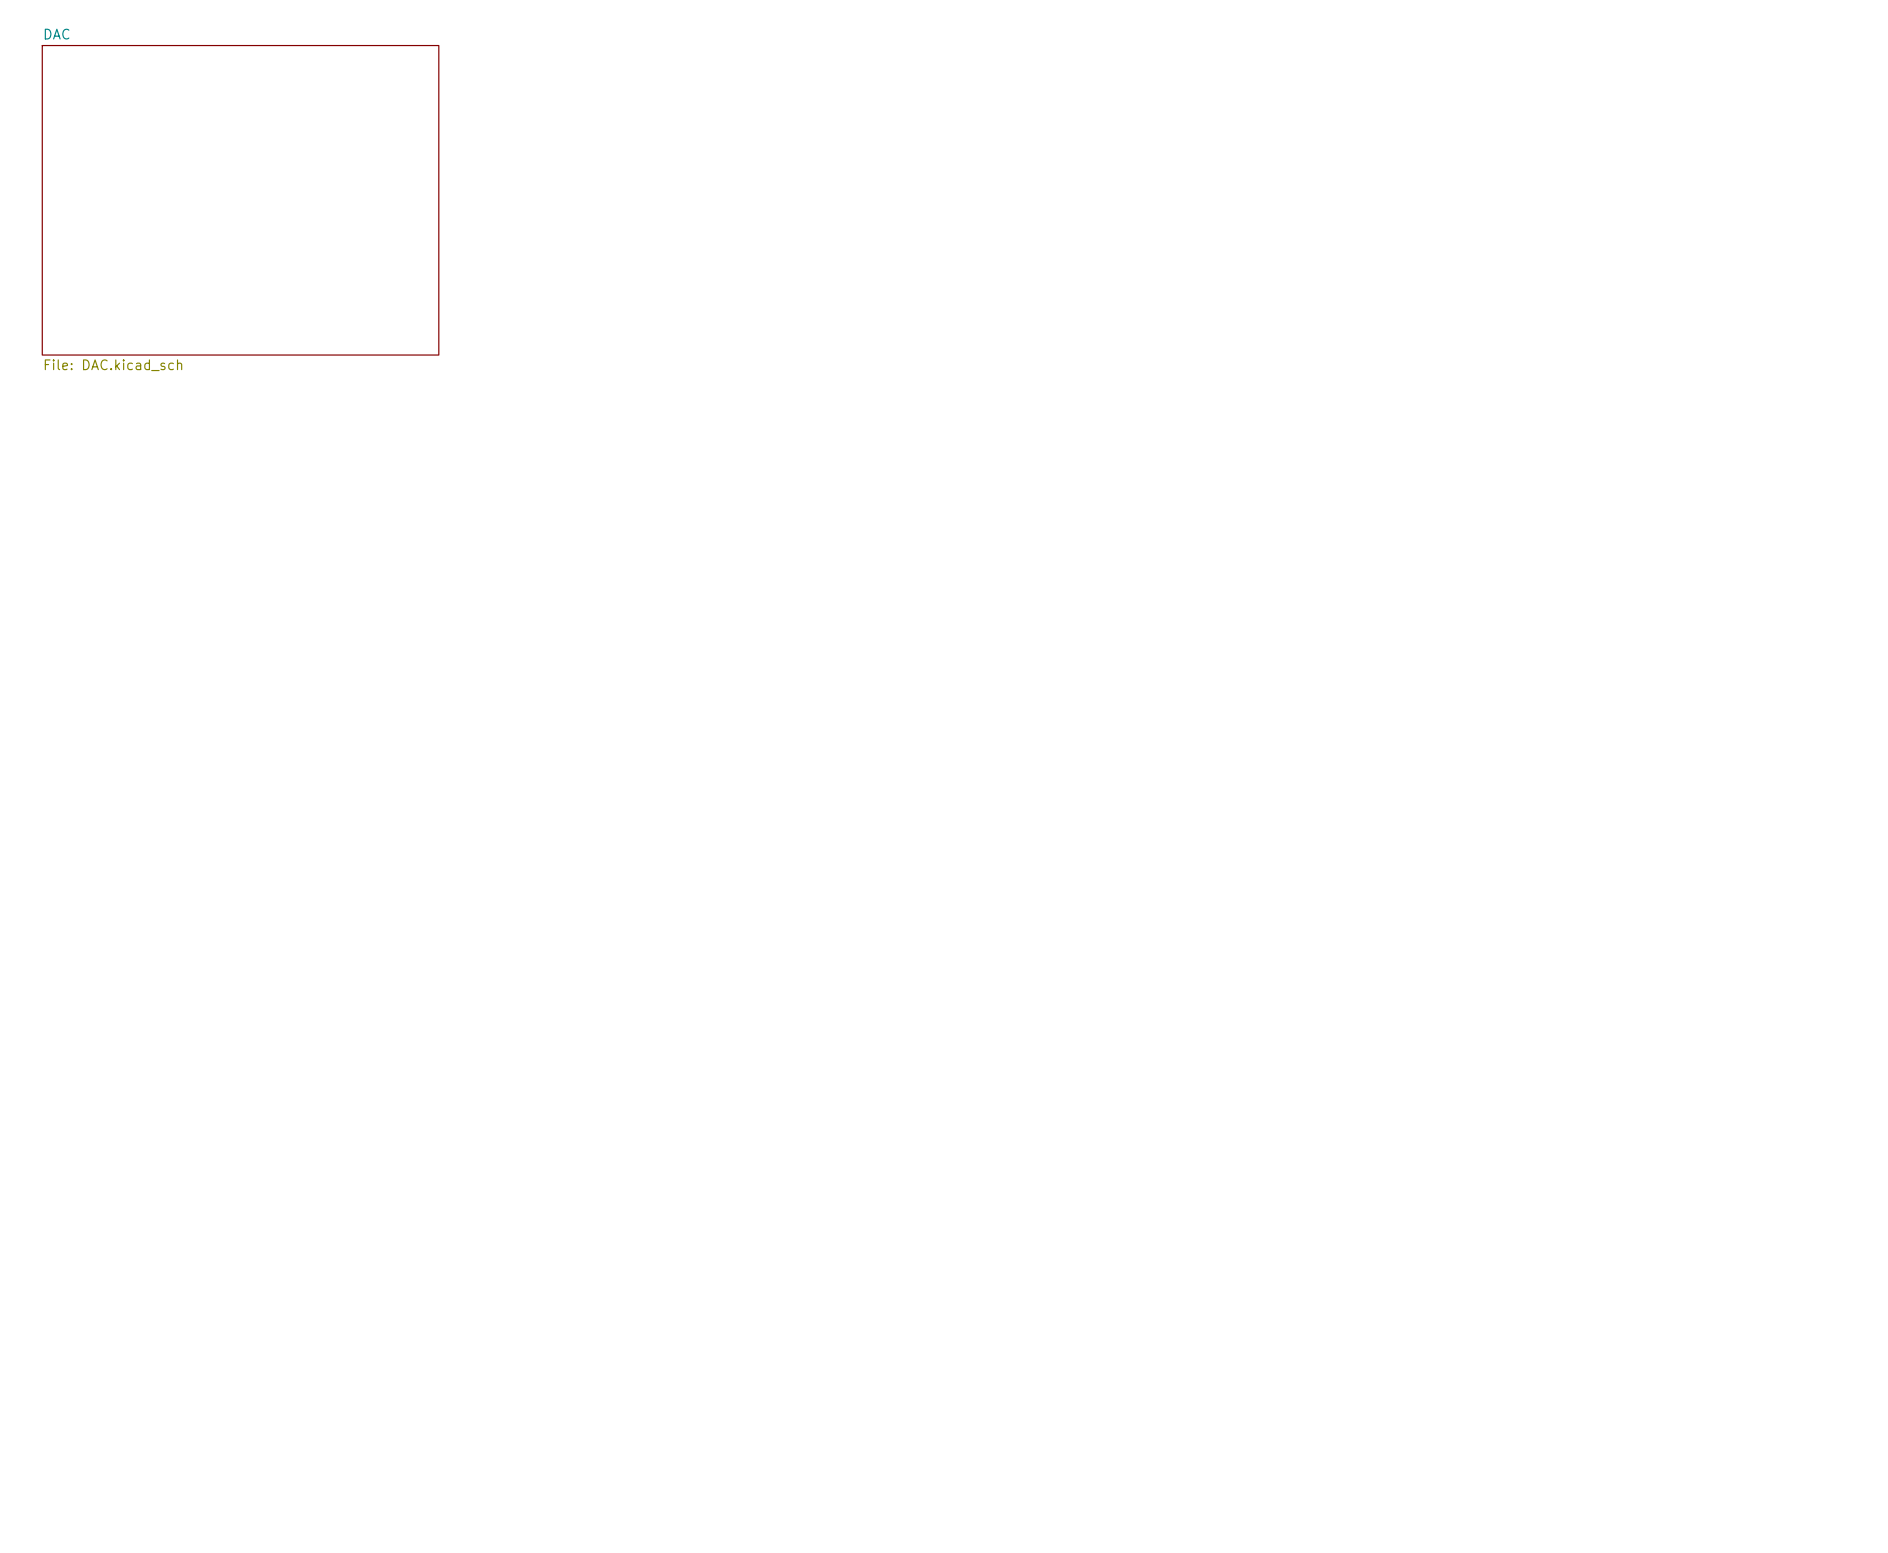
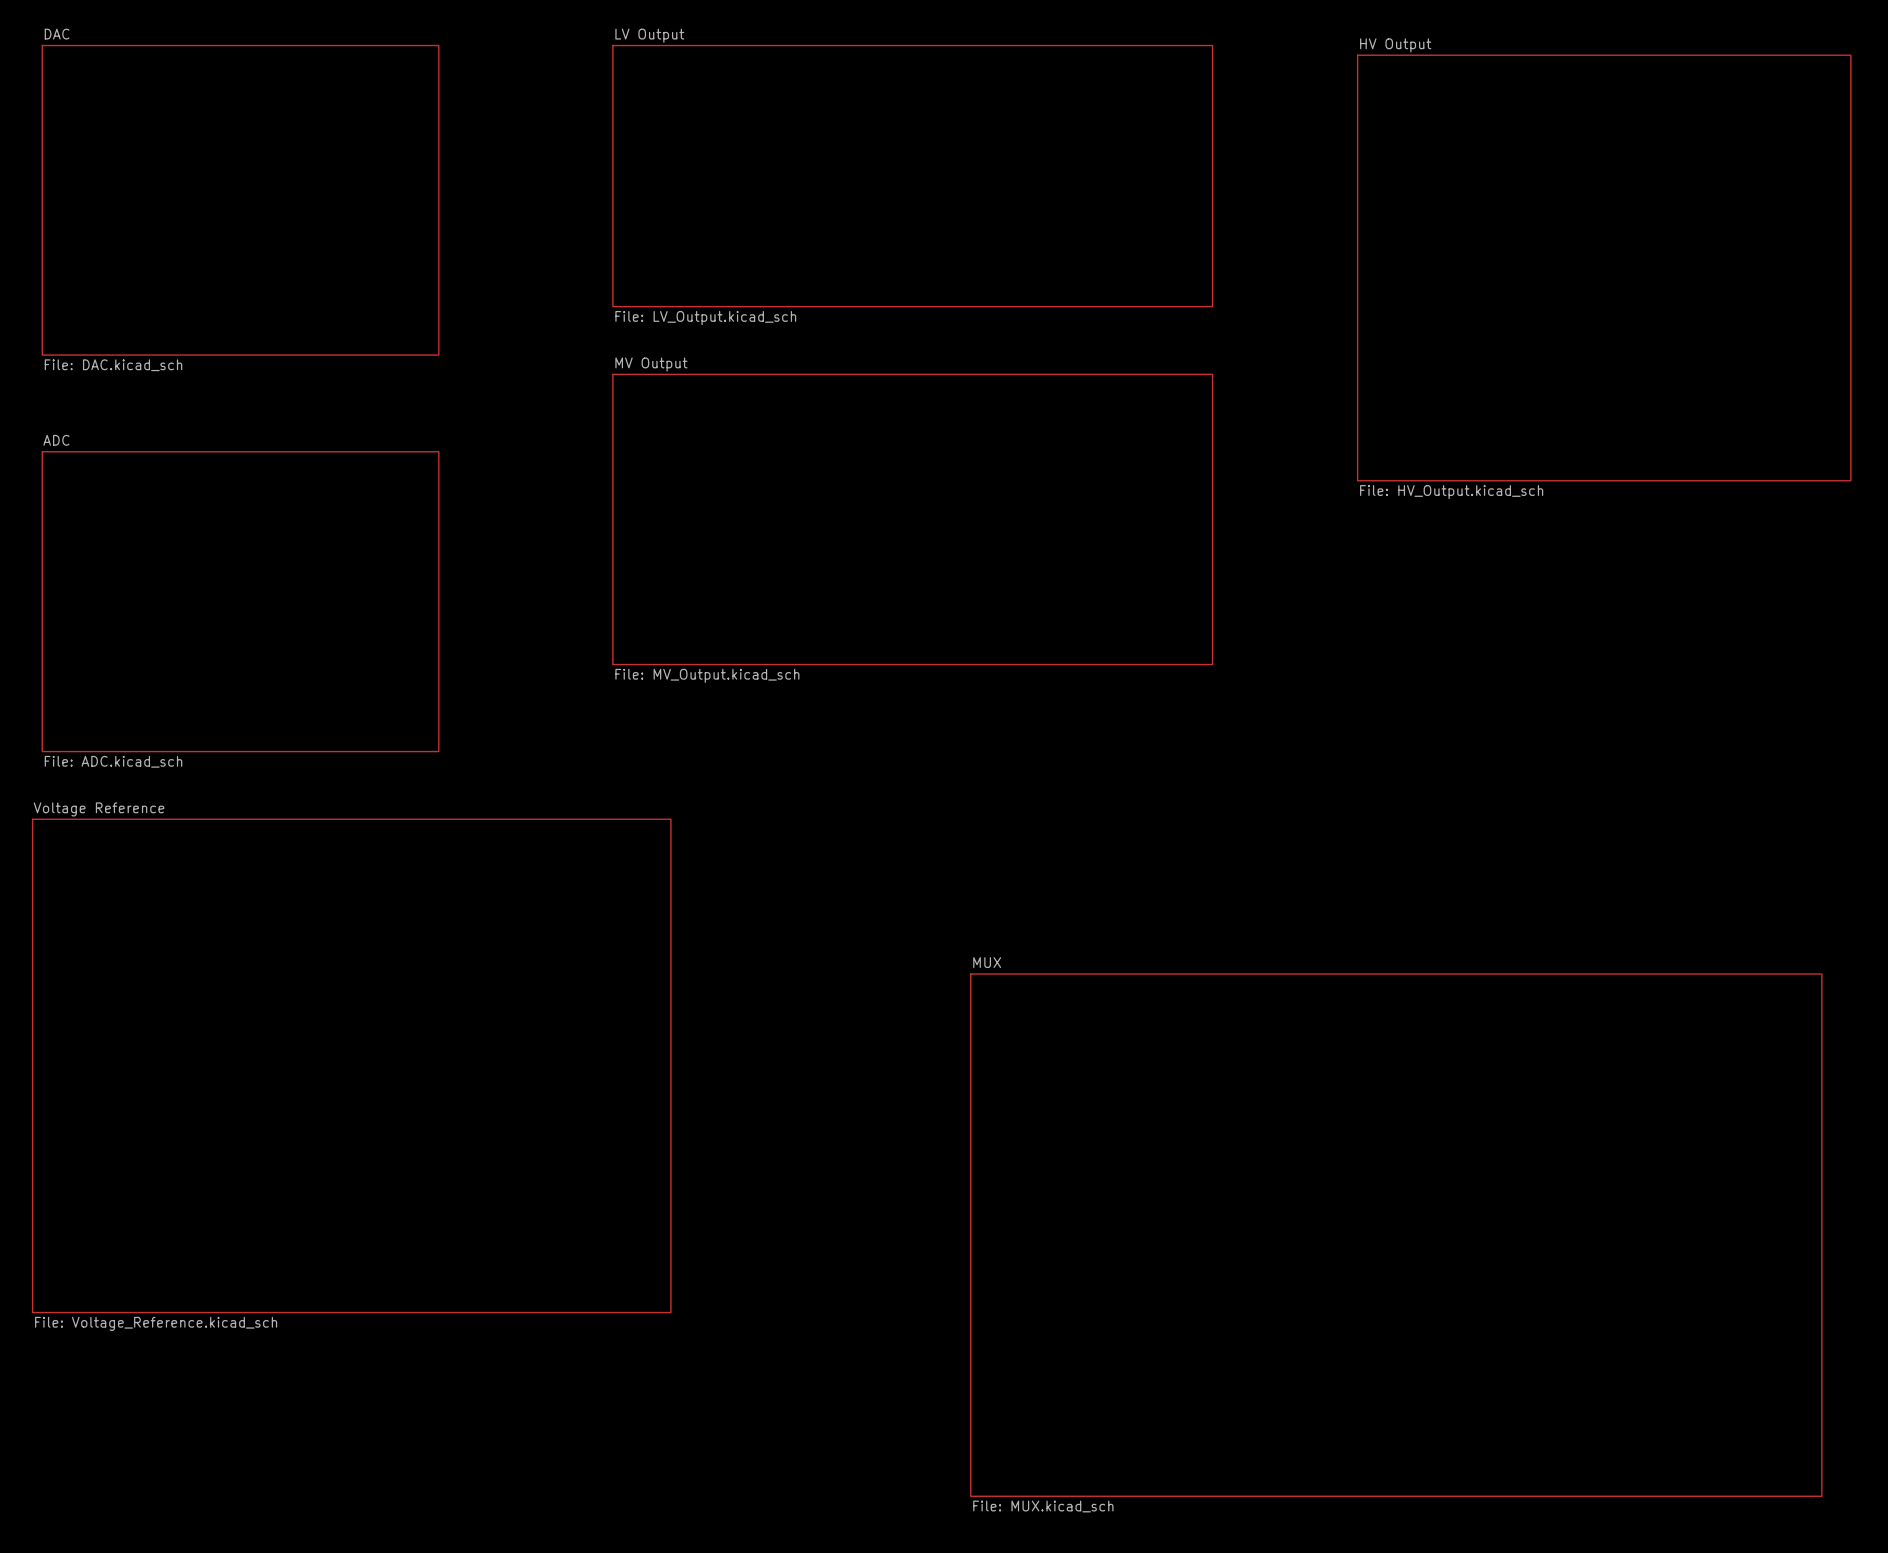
sheet LV Output: none -> File: LV_Output.kicad_sch (912, 176)
sheet HV Output: none -> File: HV_Output.kicad_sch (1604, 267)
sheet MV Output: none -> File: MV_Output.kicad_sch (912, 519)
sheet ADC: none -> File: ADC.kicad_sch (240, 601)
sheet Voltage Reference: none -> File: Voltage_Reference.kicad_sch (351, 1065)
sheet MUX: none -> File: MUX.kicad_sch (1396, 1235)

